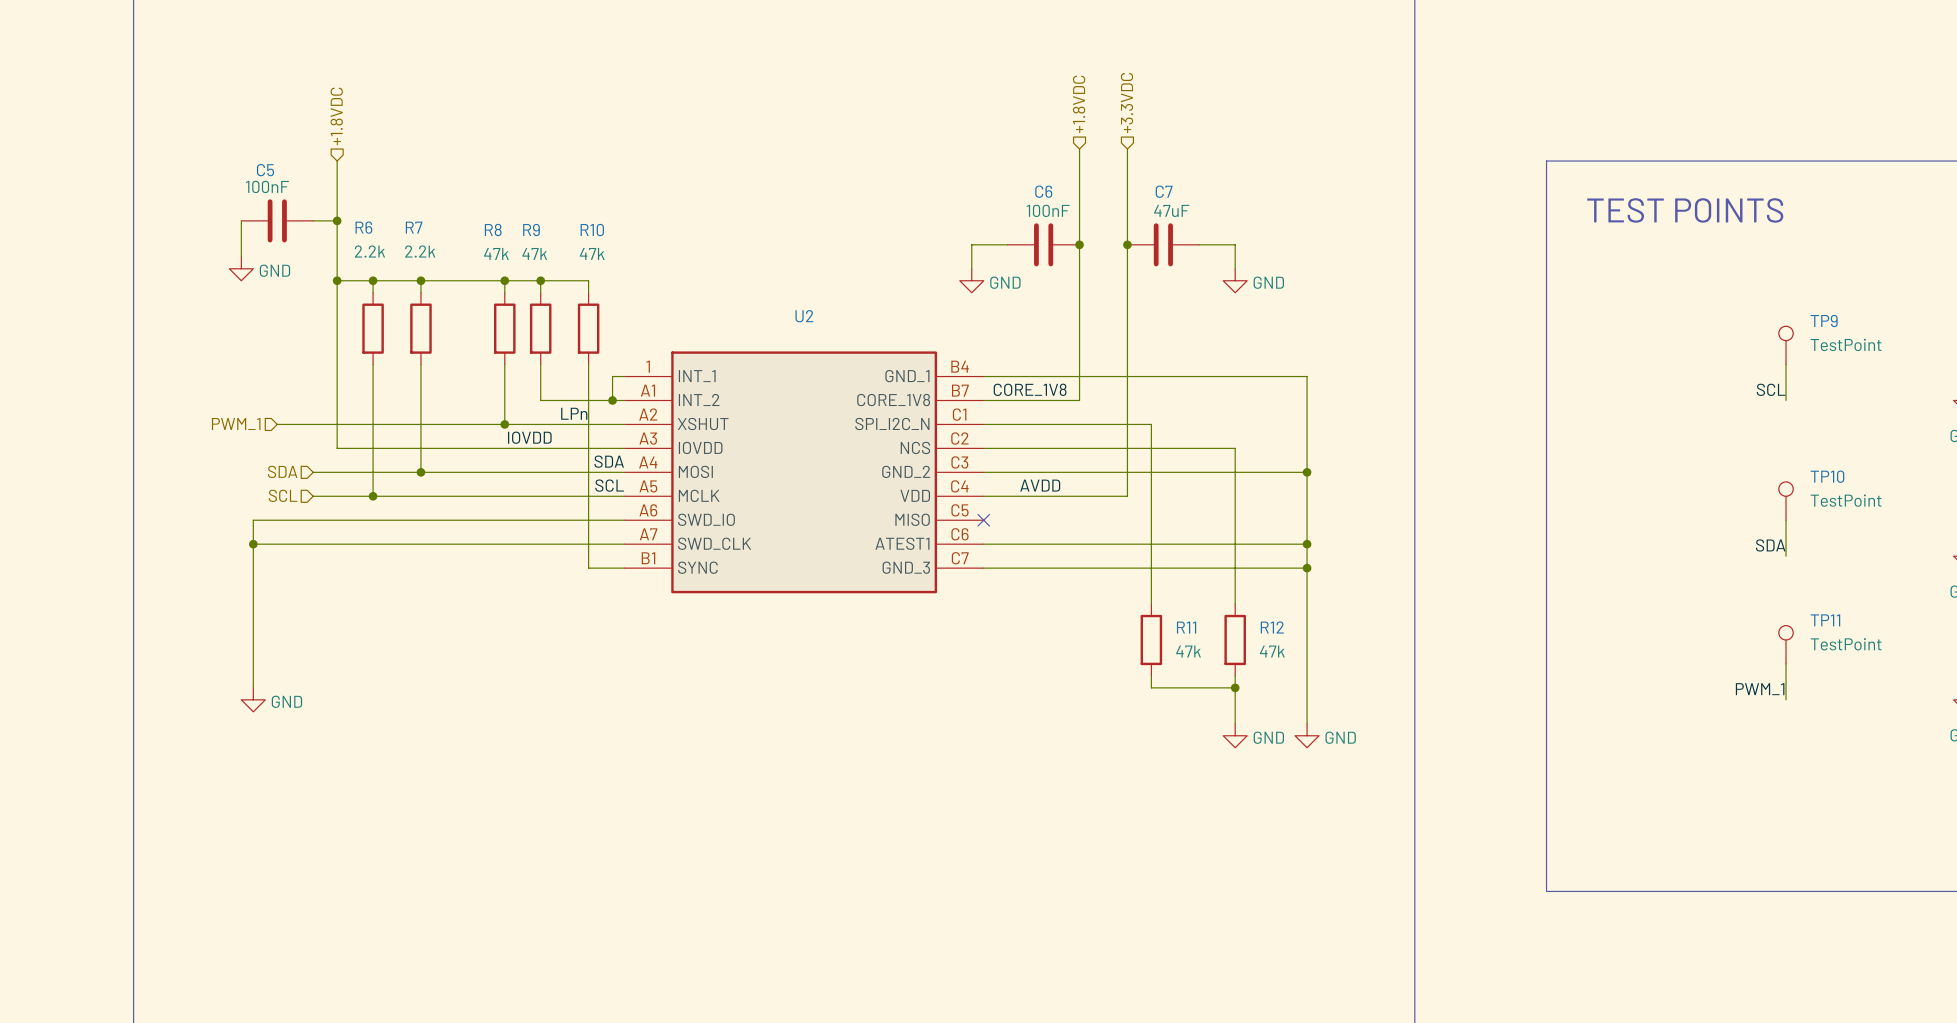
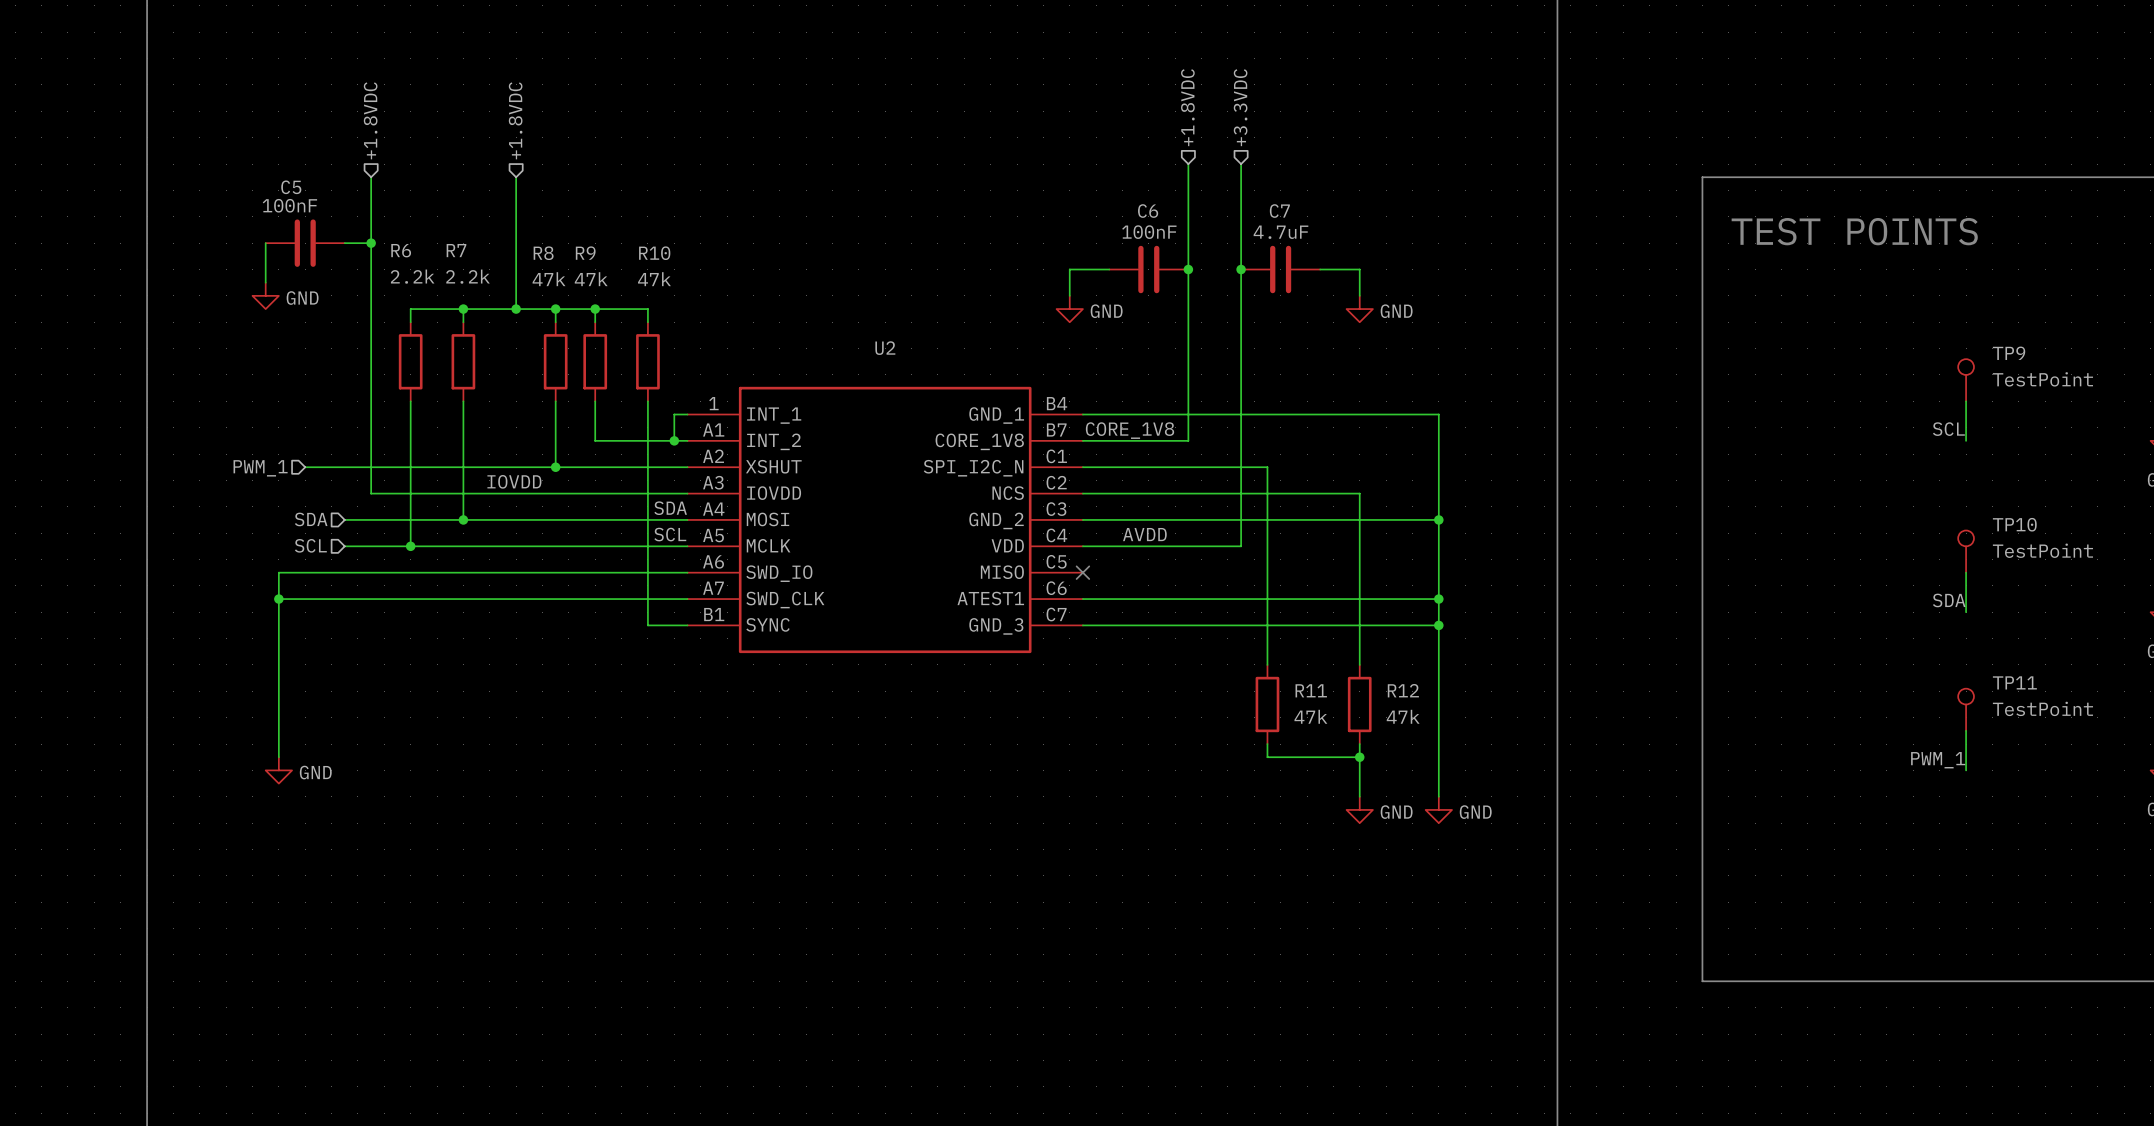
hierarchical label: none -> +1.8VDC (515, 120)
wire: none -> (516, 177) (516, 309)
C7 value: 47uF (1171, 210) -> 4.7uF (1280, 232)
wire: (337, 280) (373, 280) -> none
junction: (337, 280) -> none
junction: (373, 280) -> none
junction: none -> (516, 309)
label: LPn (574, 413) -> none
label position: IOVDD (529, 437) -> IOVDD (514, 481)

